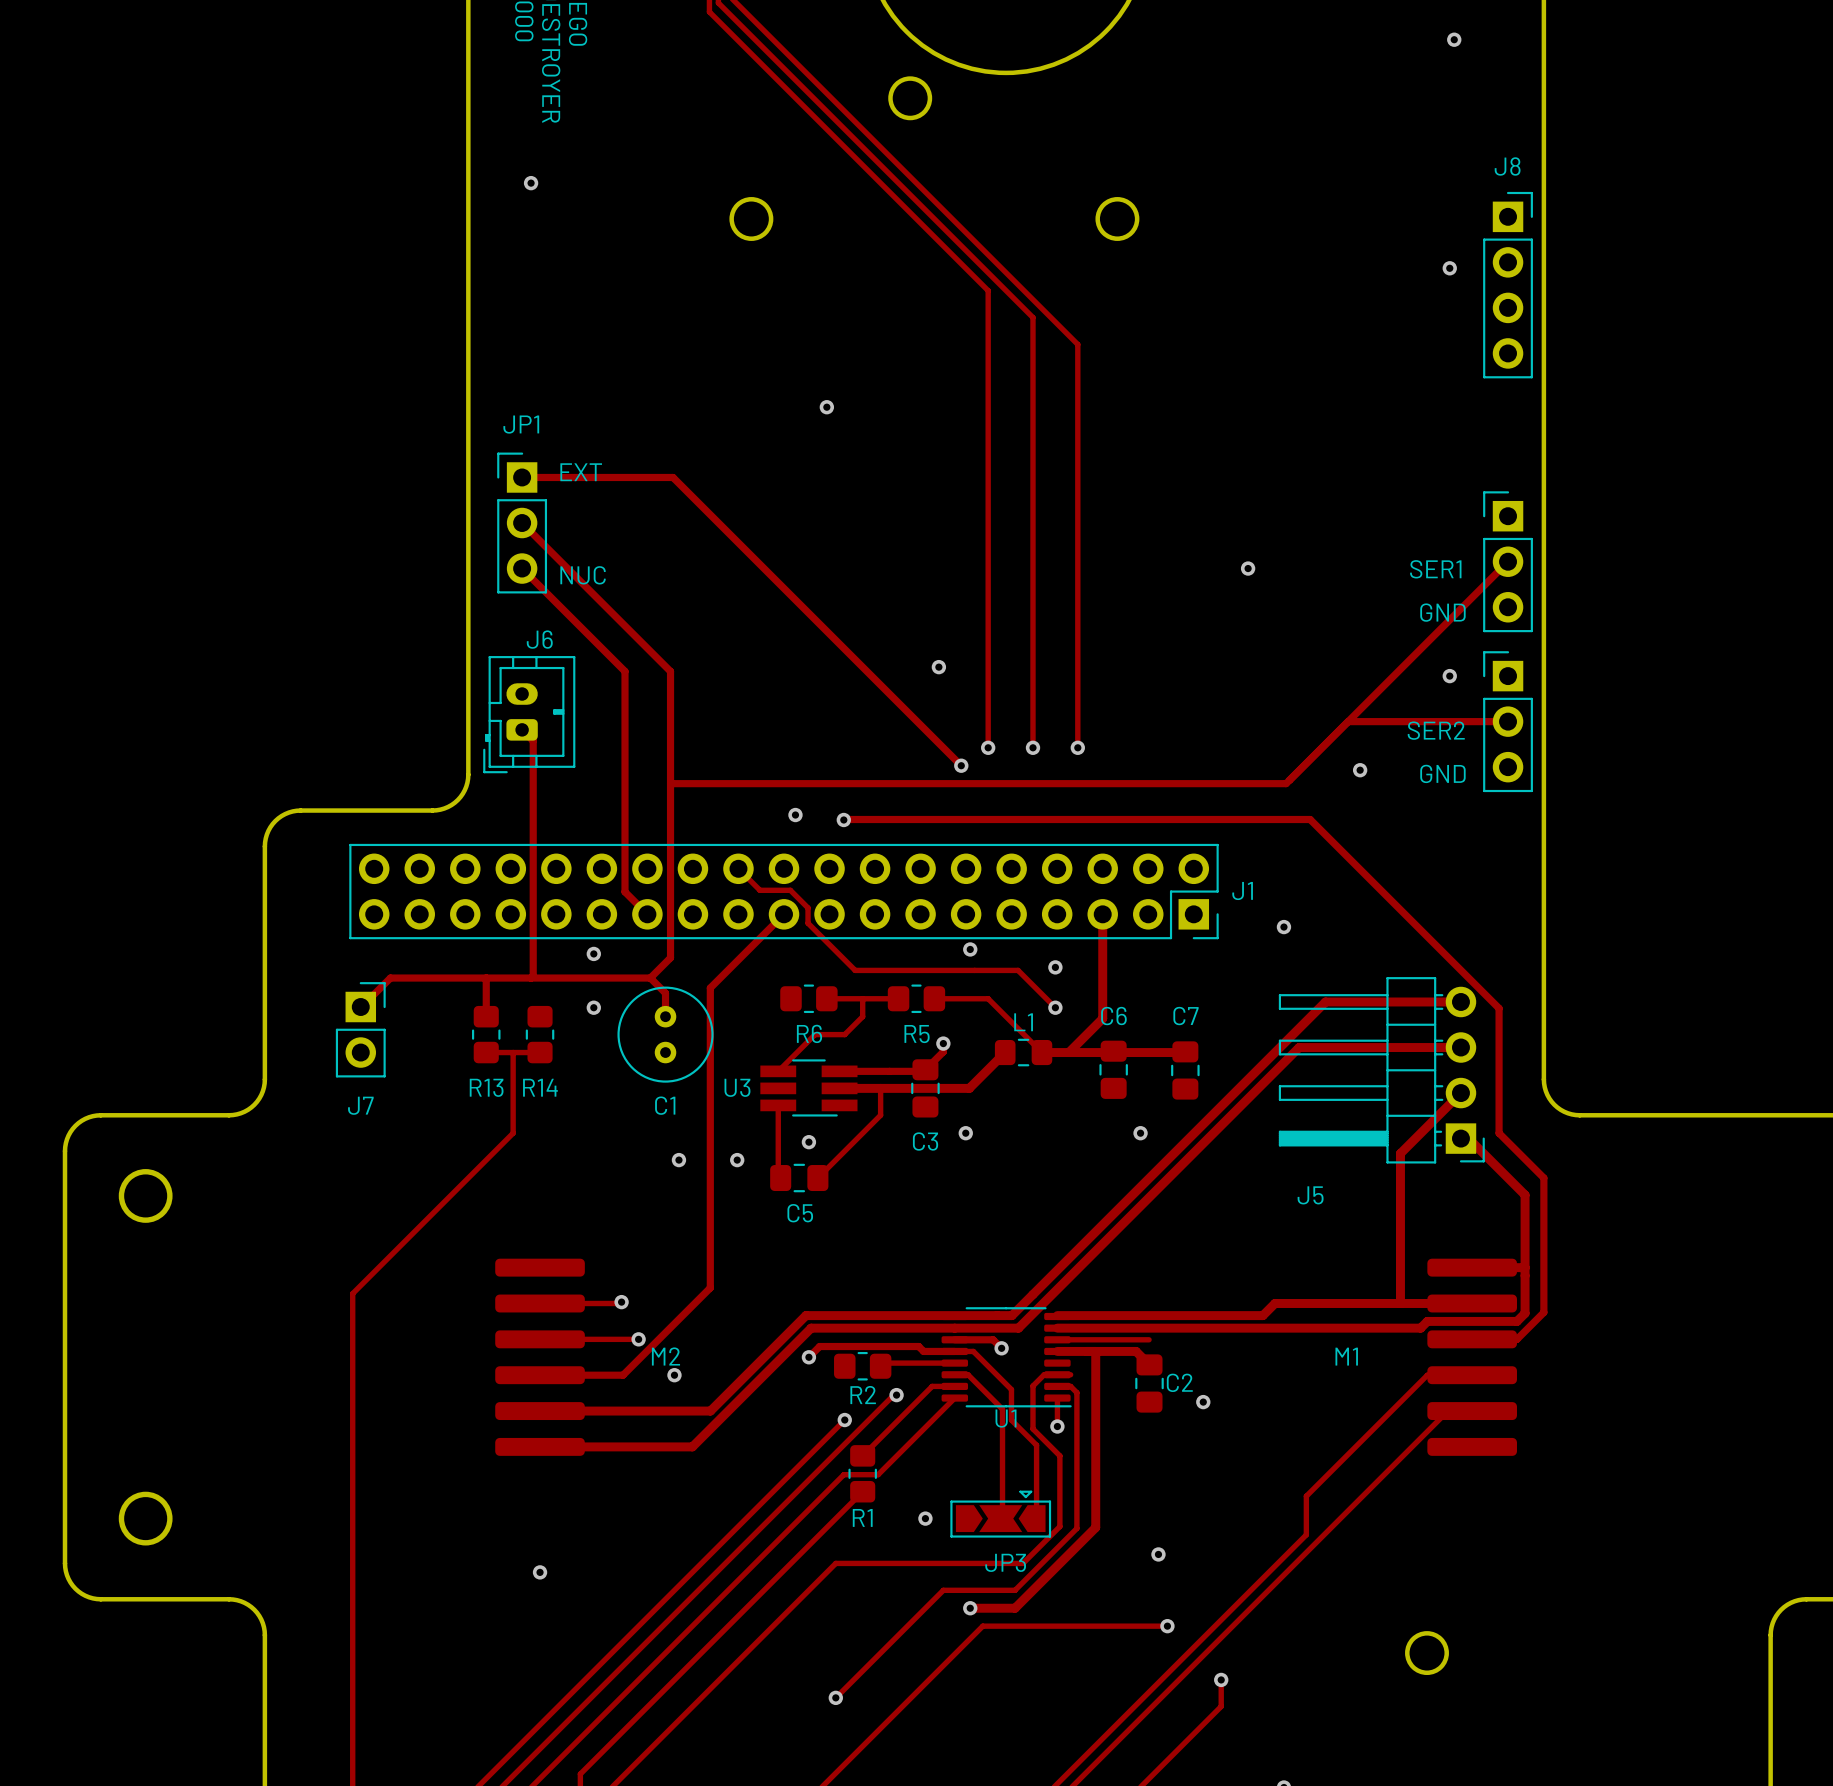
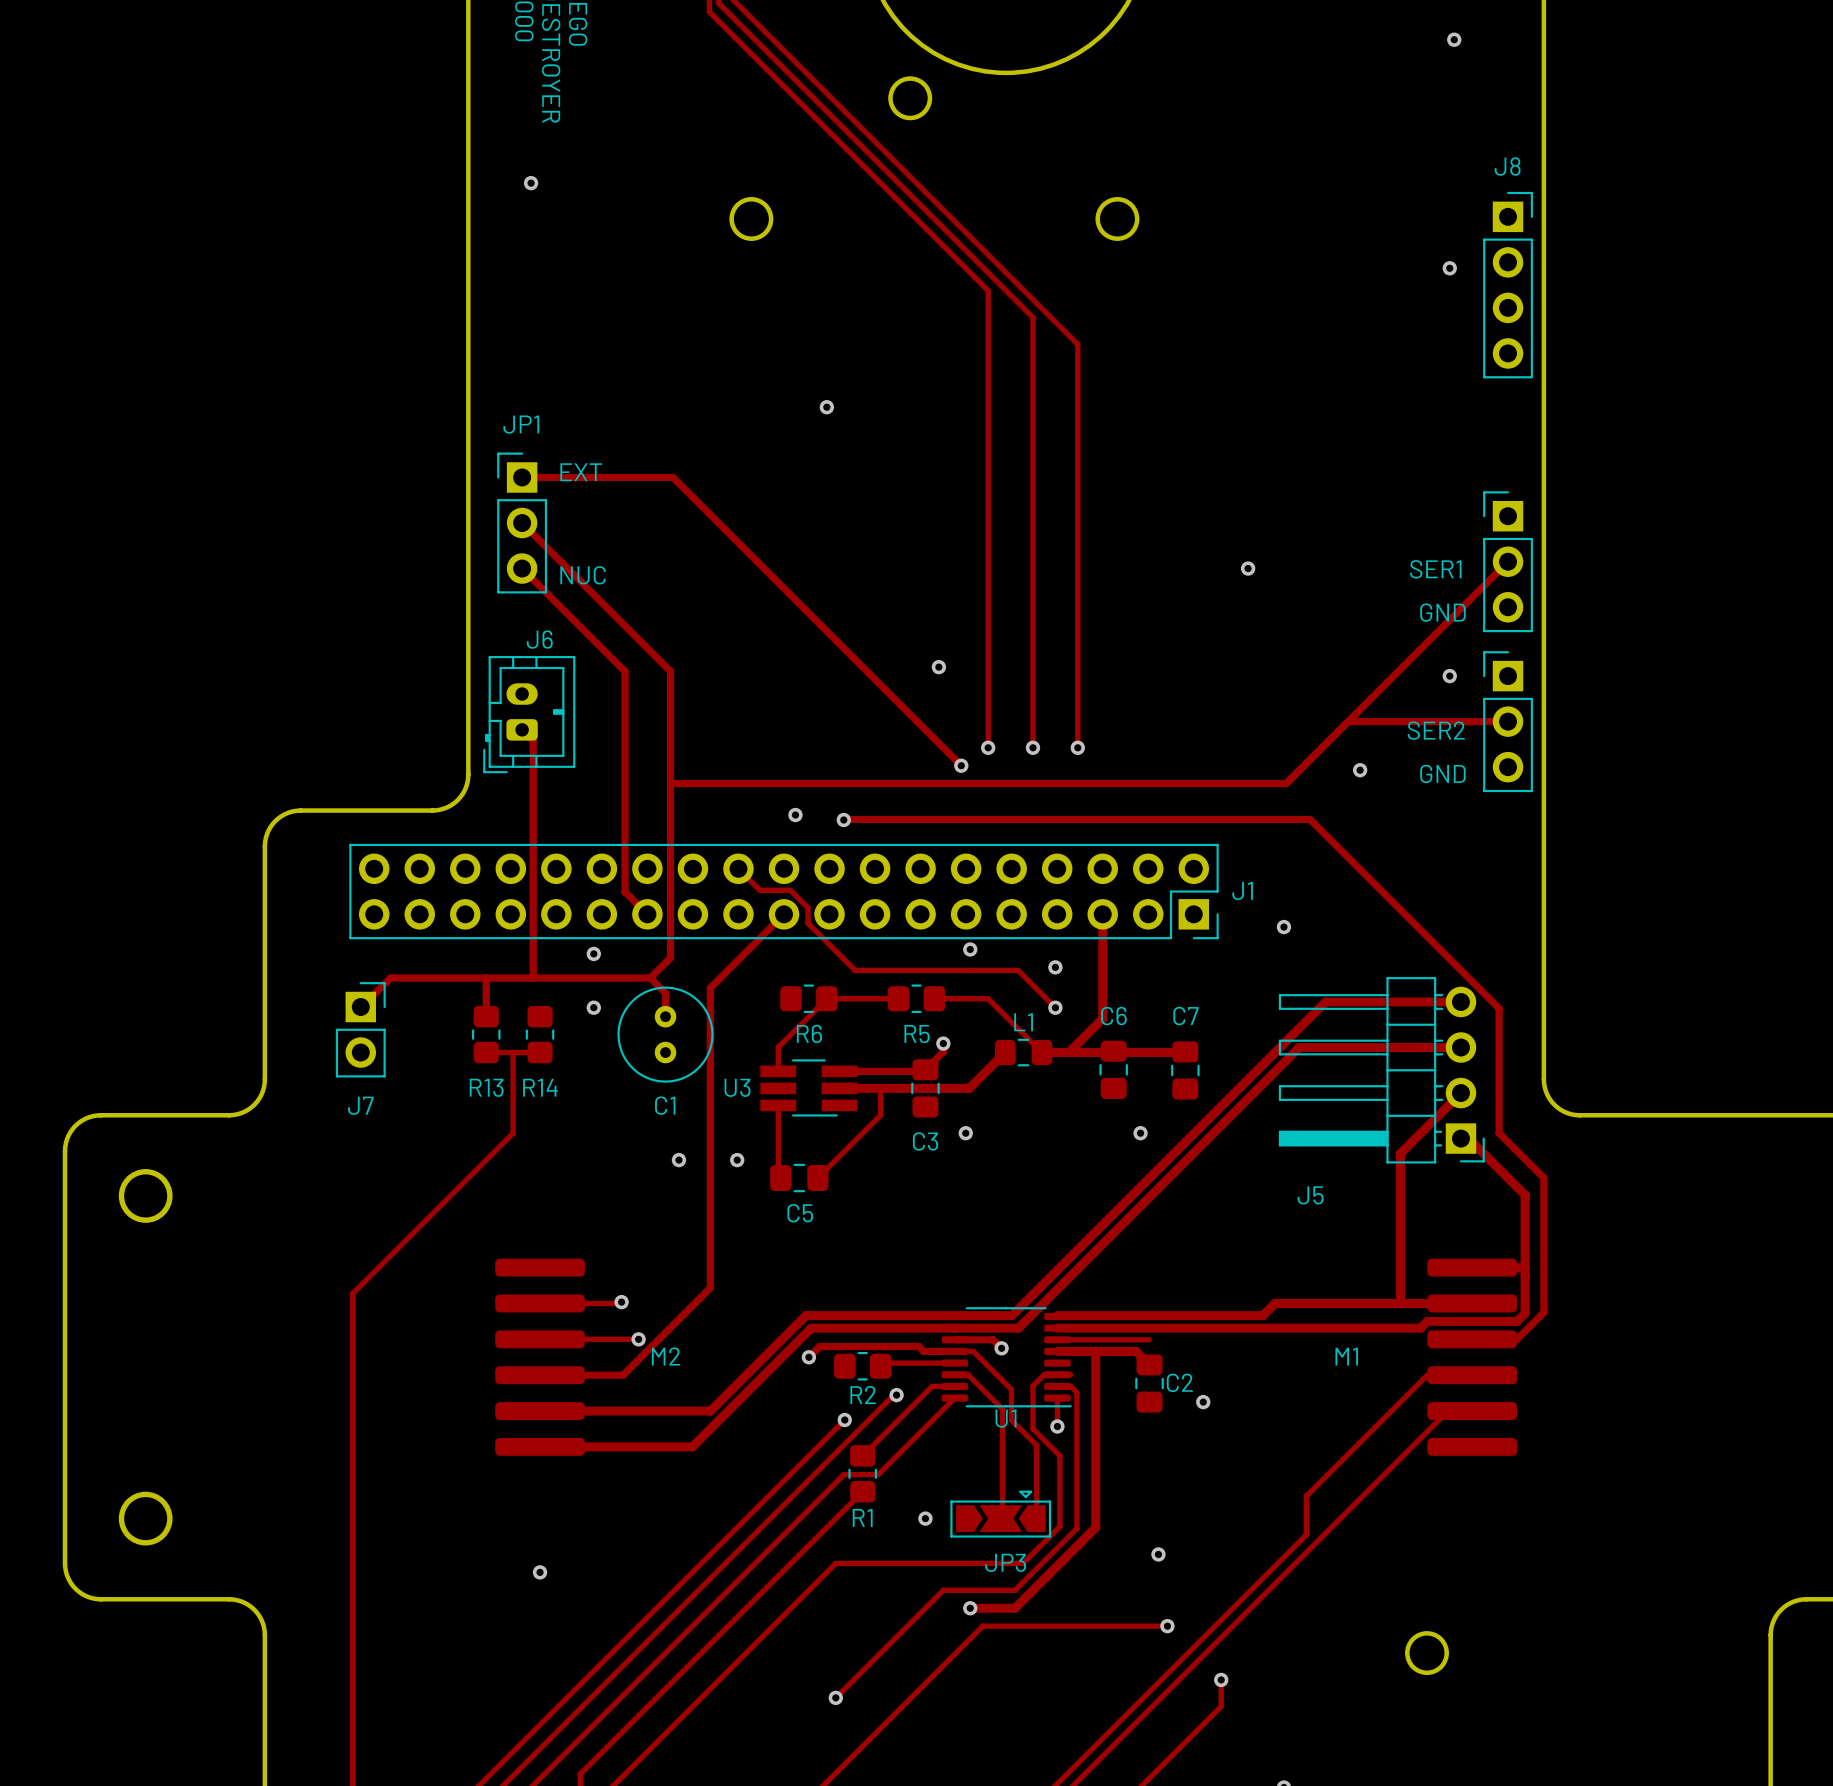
track: (862, 998) (862, 1016) (844, 1034) (815, 1034) (778, 1071) -> (826, 998) (778, 1047) (778, 1071)
via: (808, 1142) -> none
via: (674, 1375) -> none

